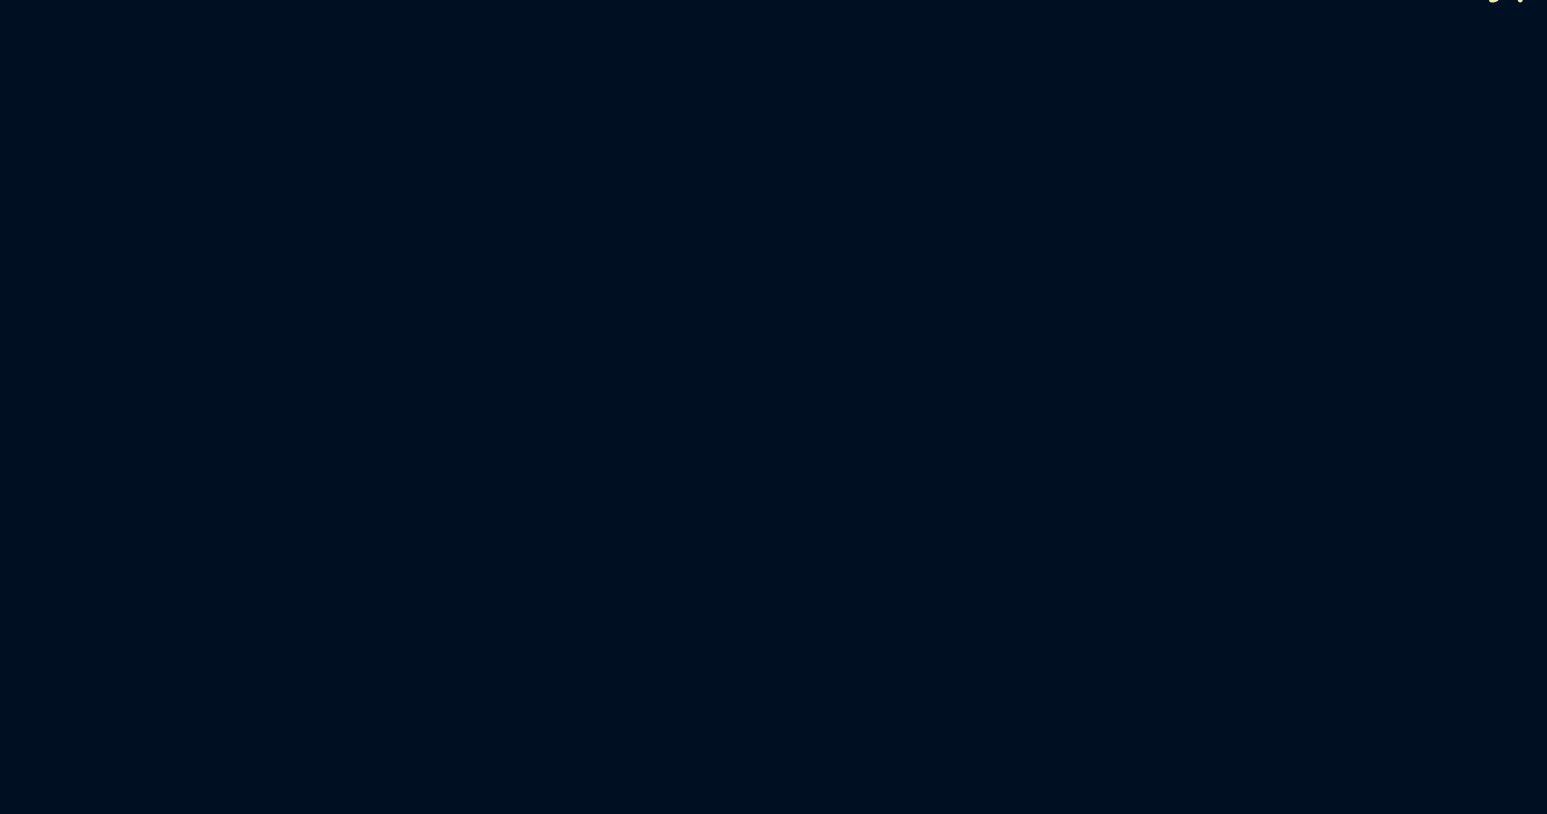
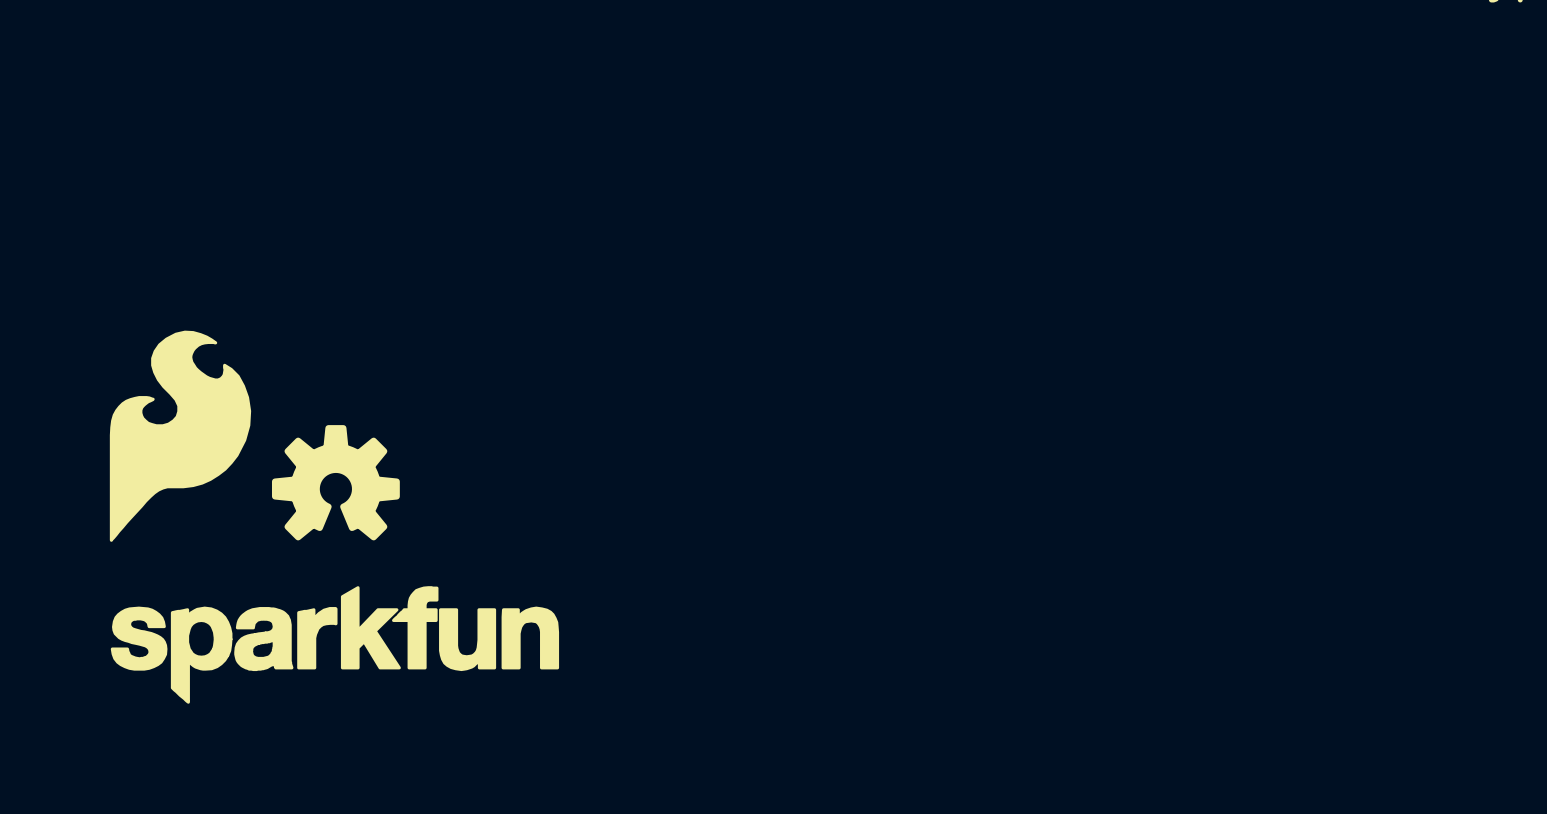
drawing: none -> [109, 330, 560, 704]

